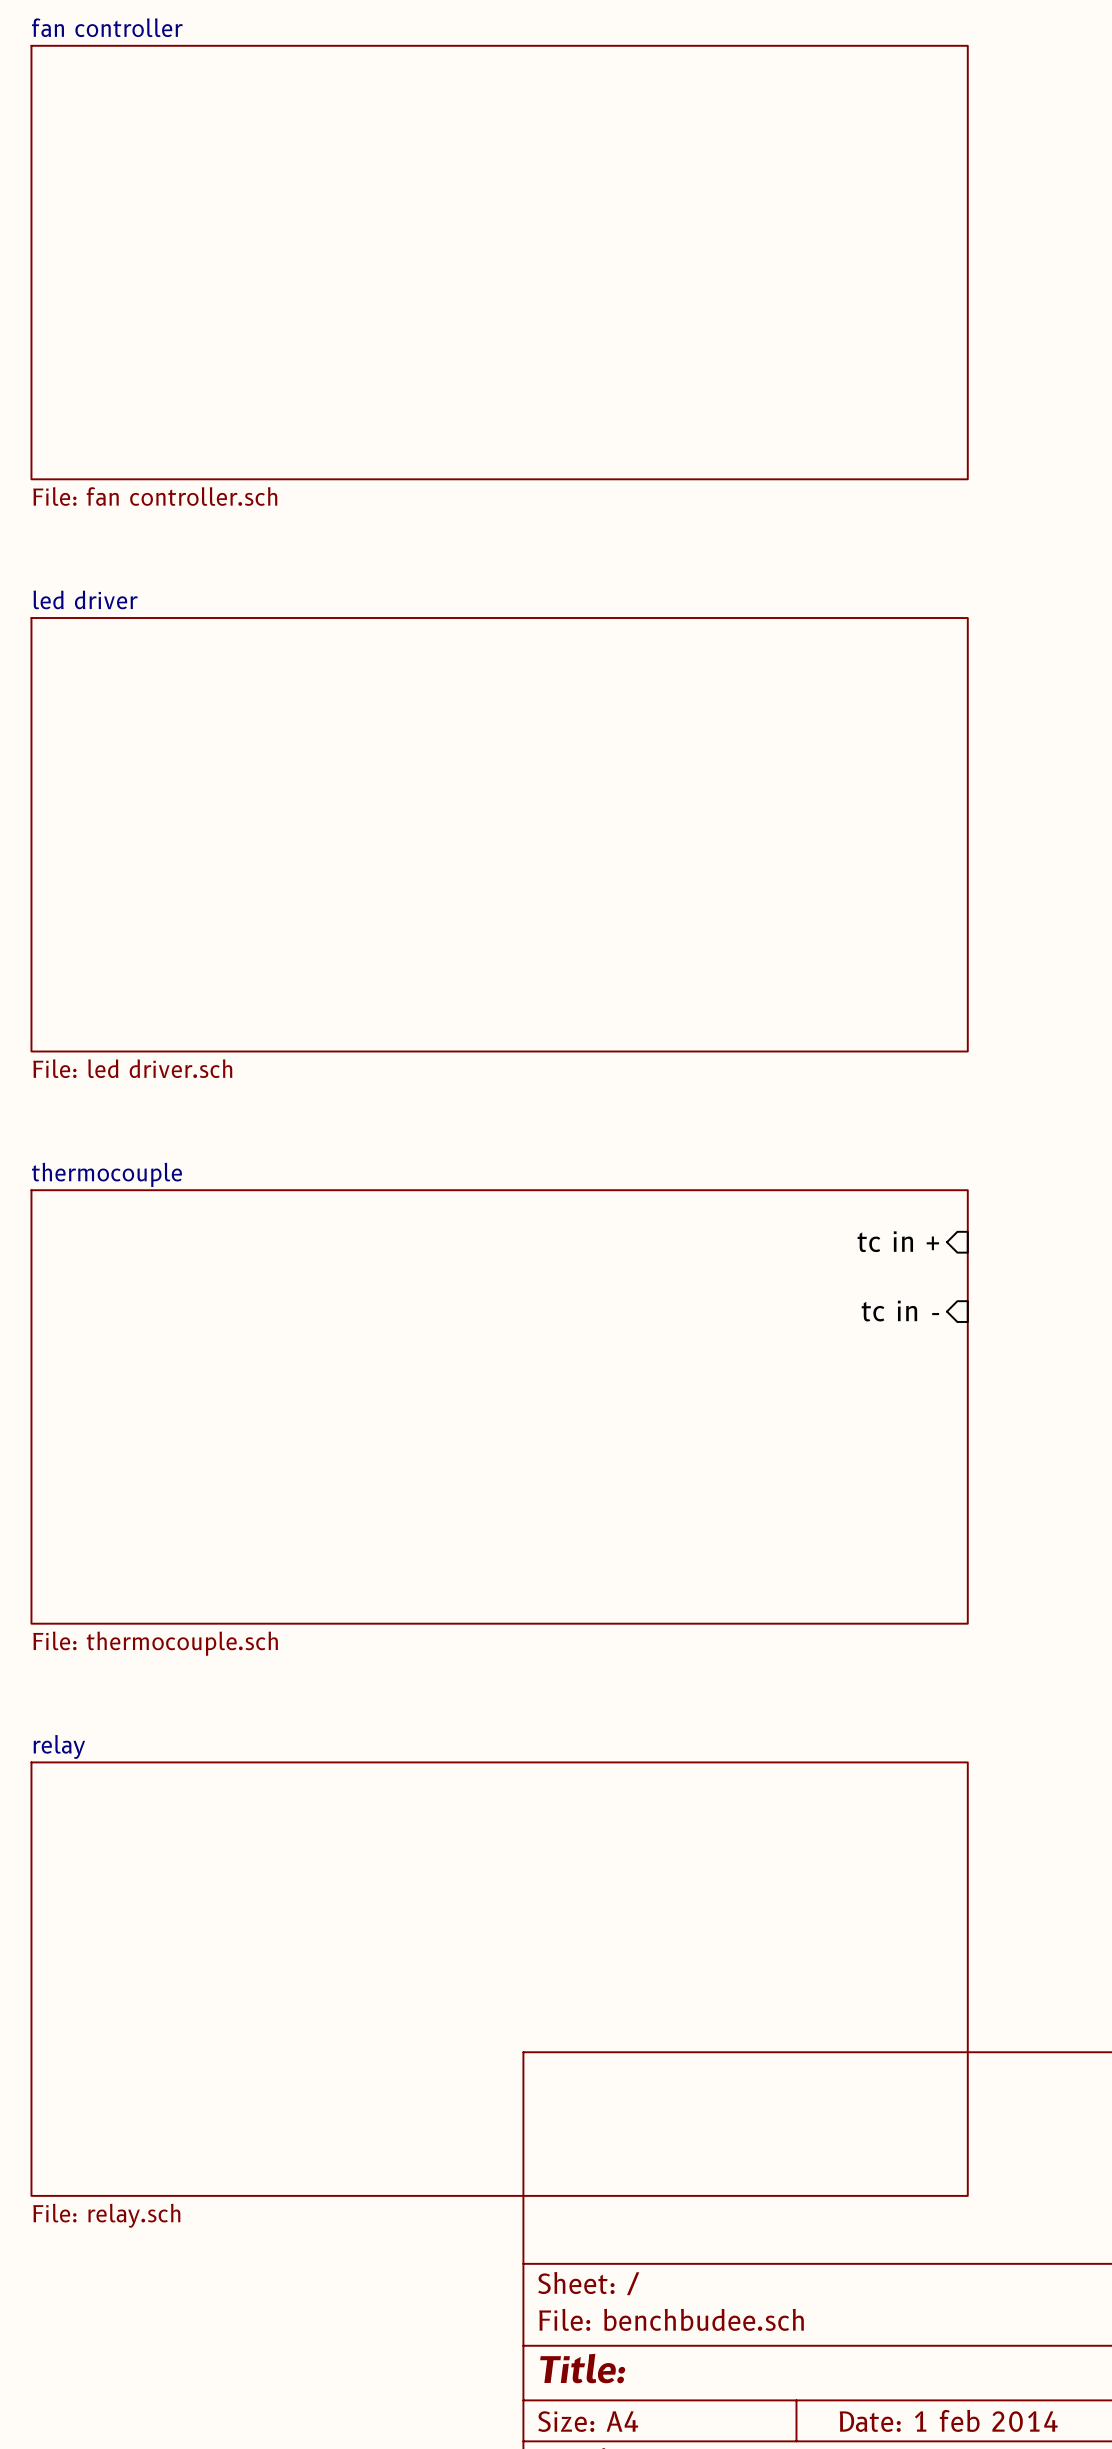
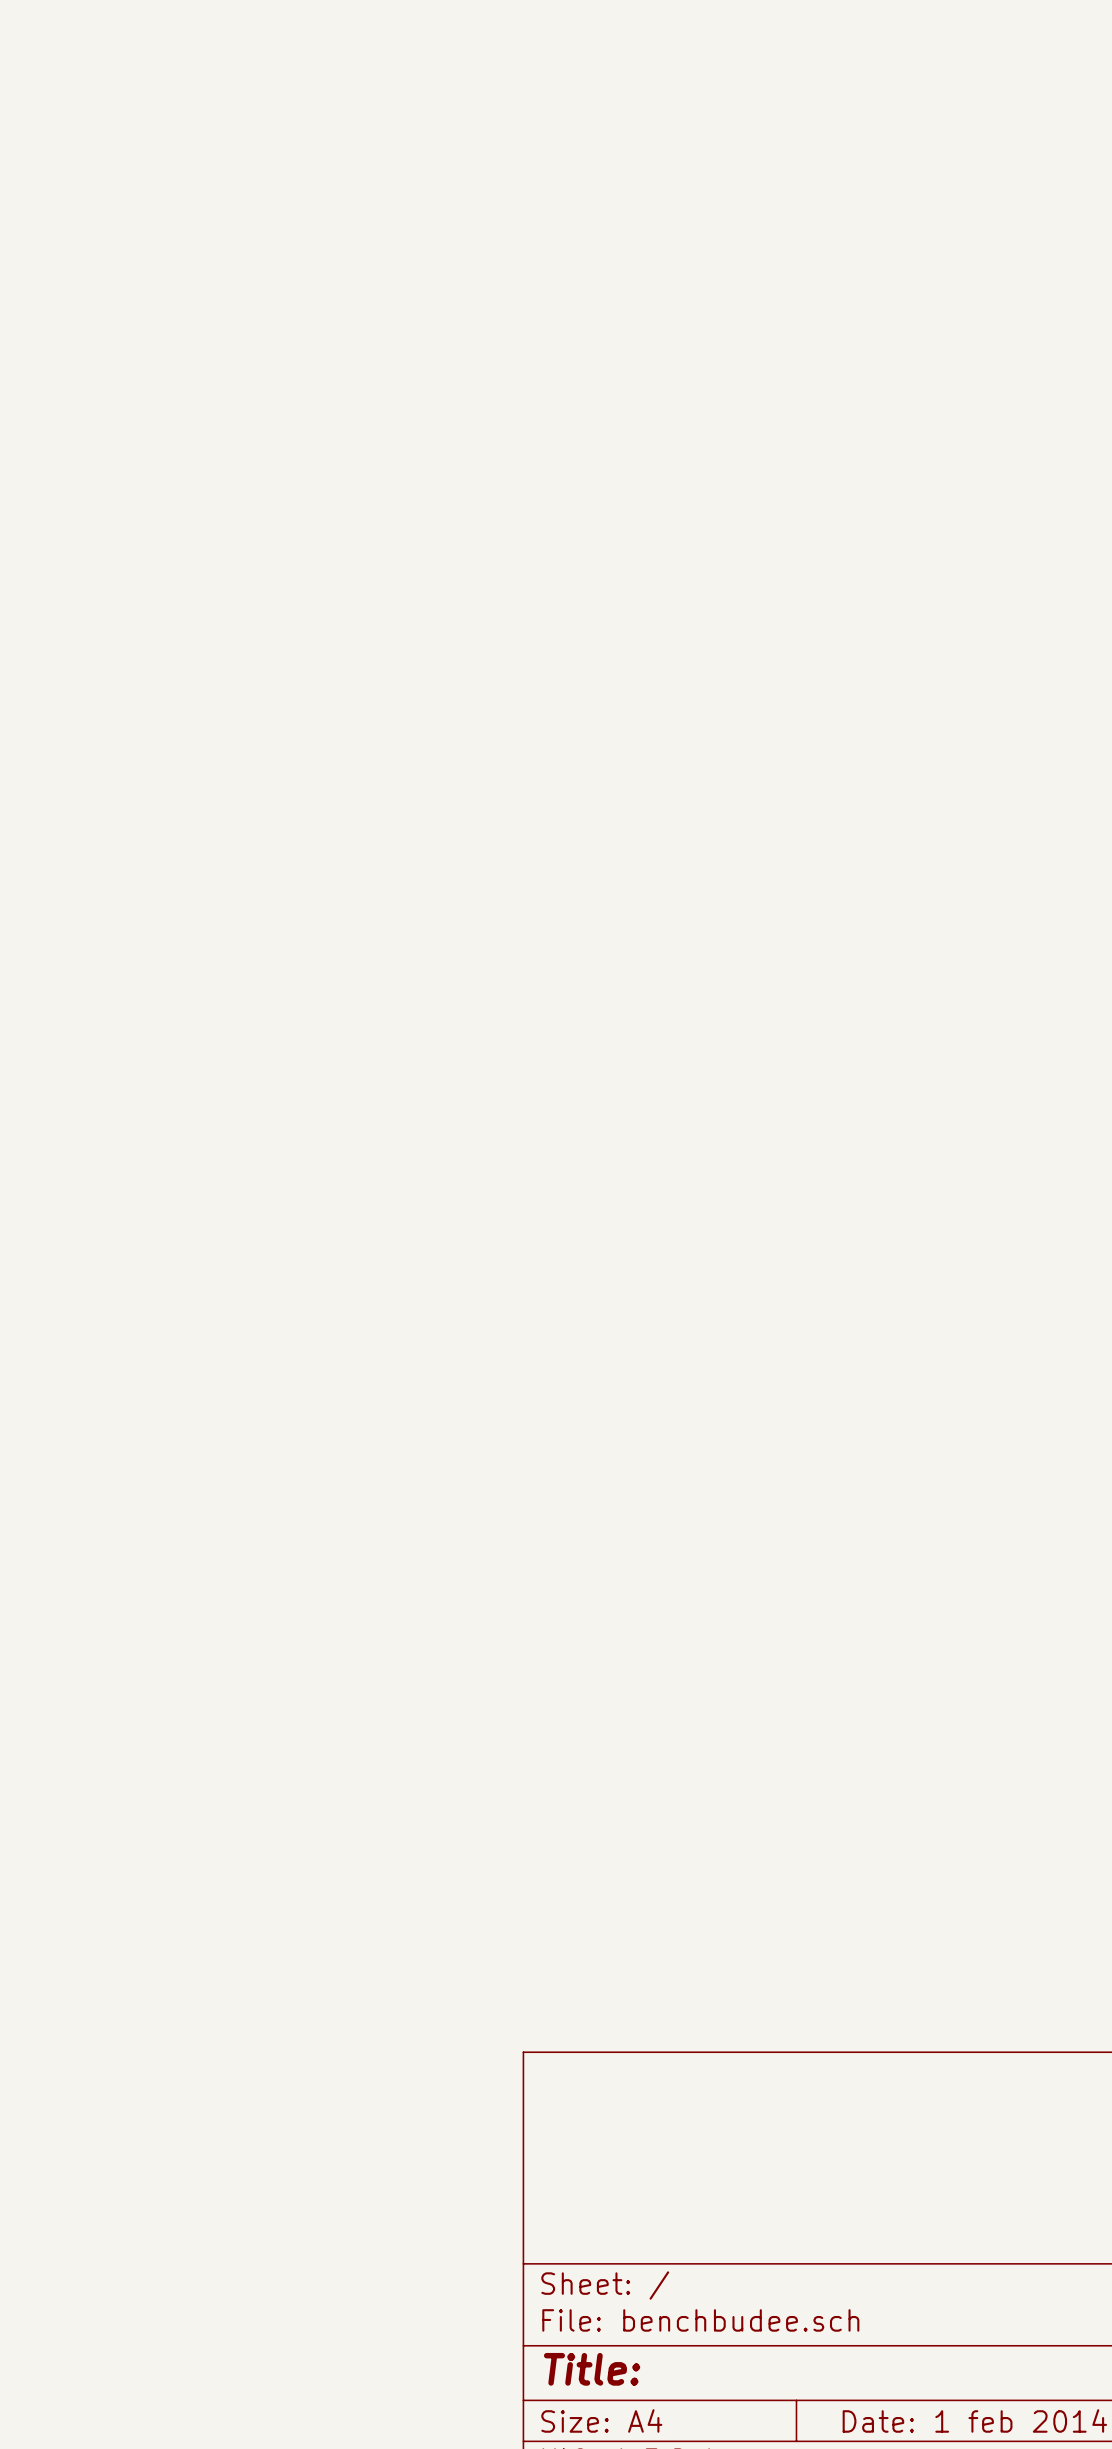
sheet fan controller: File: fan controller.sch (499, 262) -> none
sheet led driver: File: led driver.sch (499, 834) -> none
sheet pin: tc in + (898, 1241) -> none
sheet pin: tc in - (900, 1311) -> none
sheet thermocouple: File: thermocouple.sch (499, 1406) -> none
sheet relay: File: relay.sch (499, 1979) -> none

